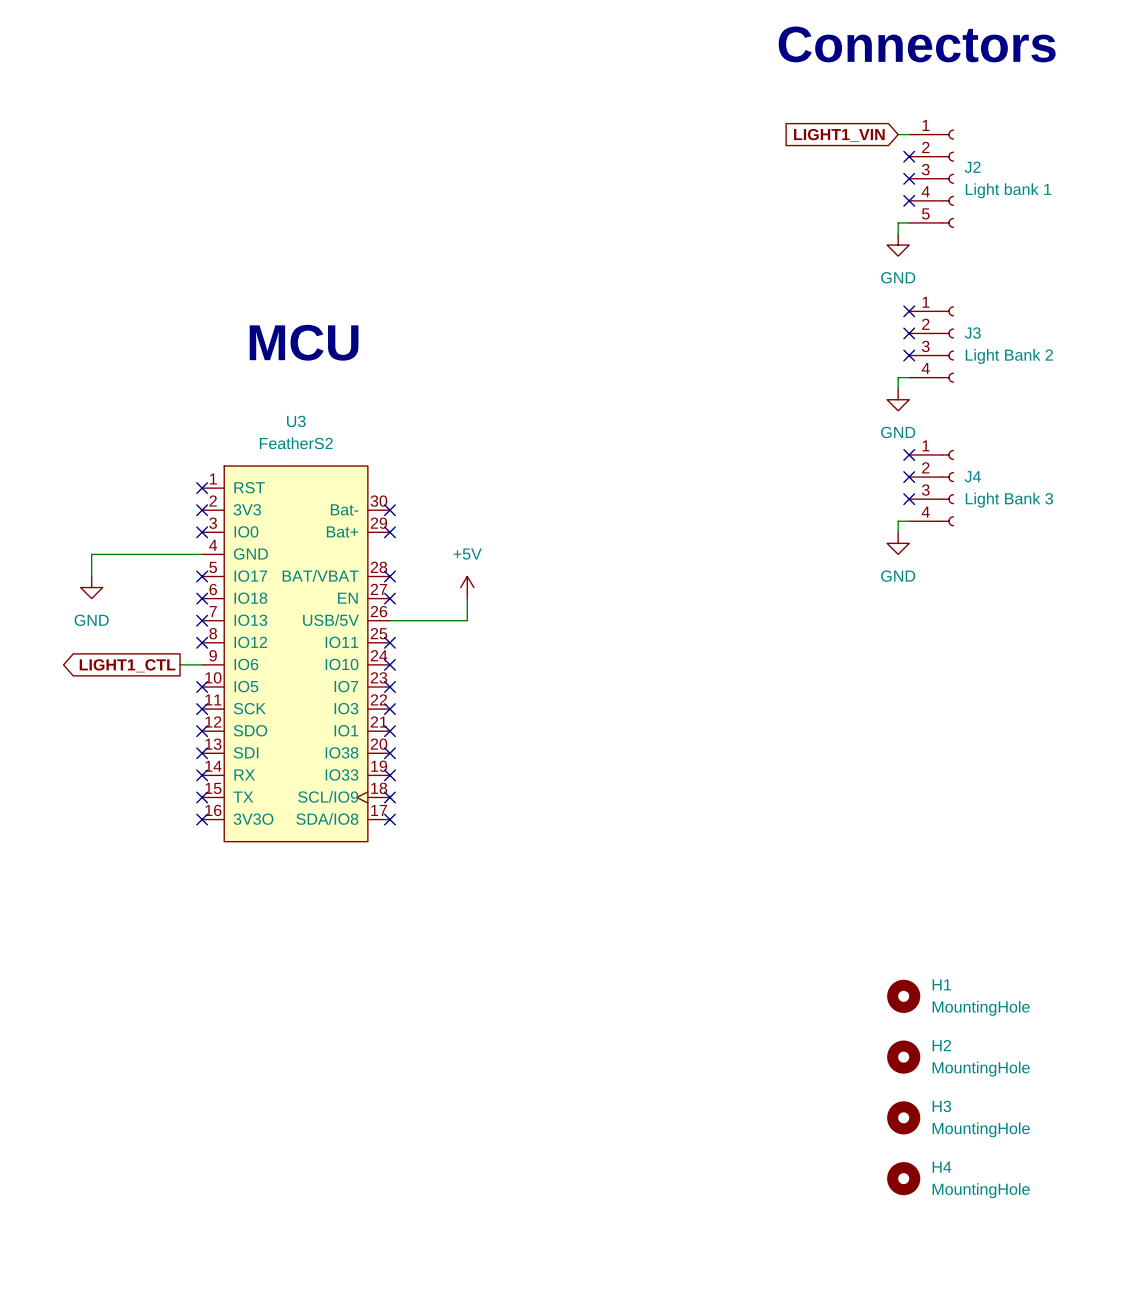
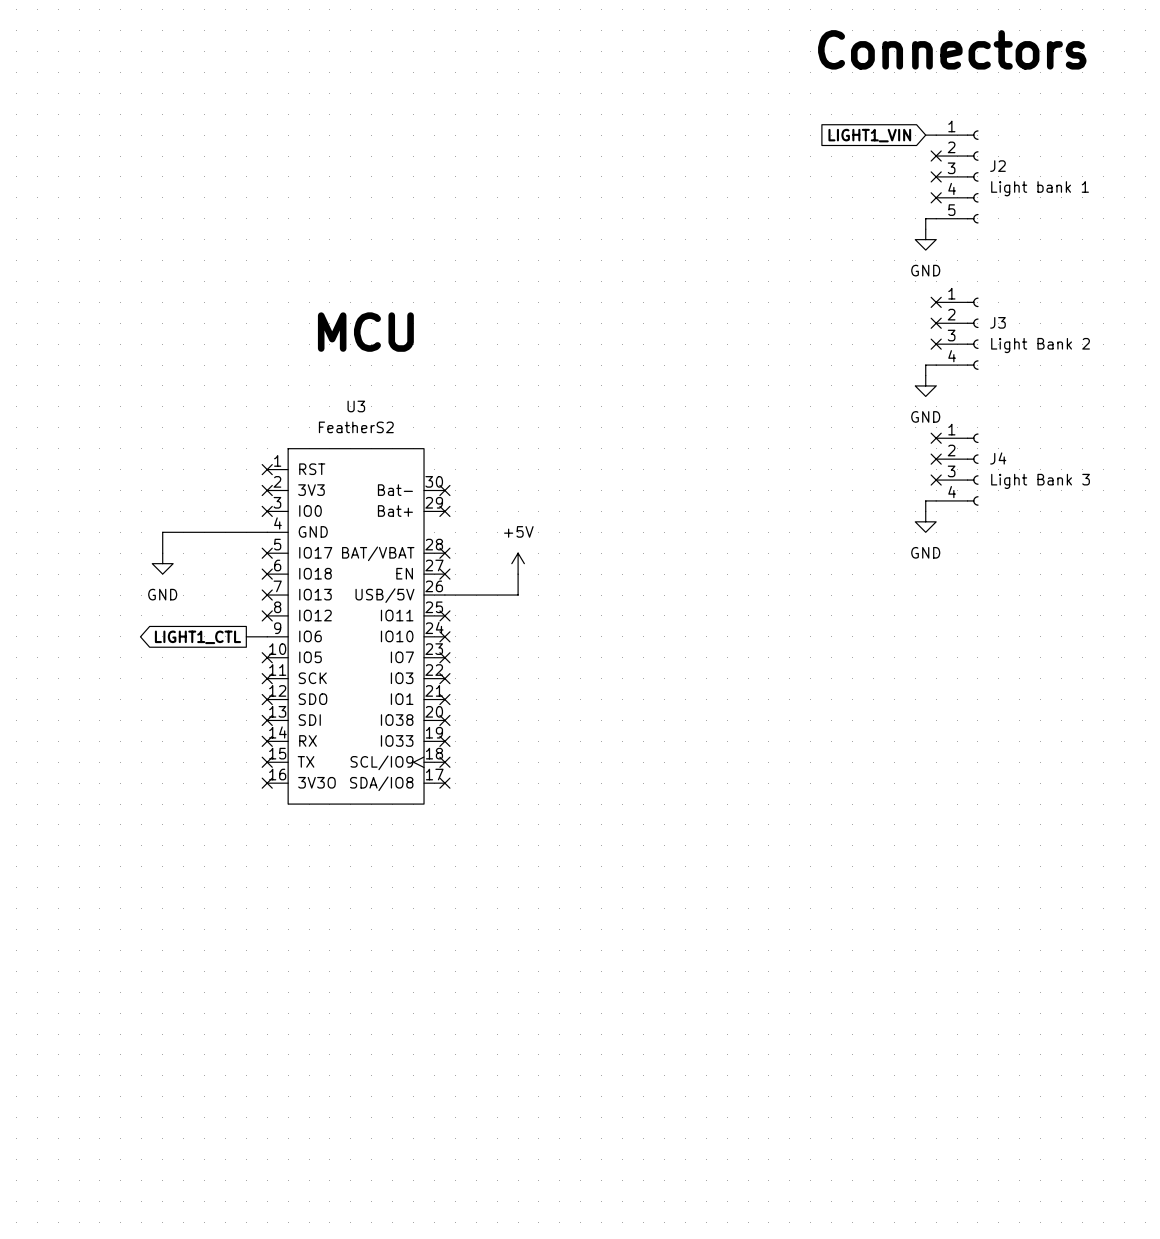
H1: MountingHole (903, 996) -> none
H2: MountingHole (903, 1057) -> none
H3: MountingHole (903, 1117) -> none
H4: MountingHole (903, 1178) -> none

